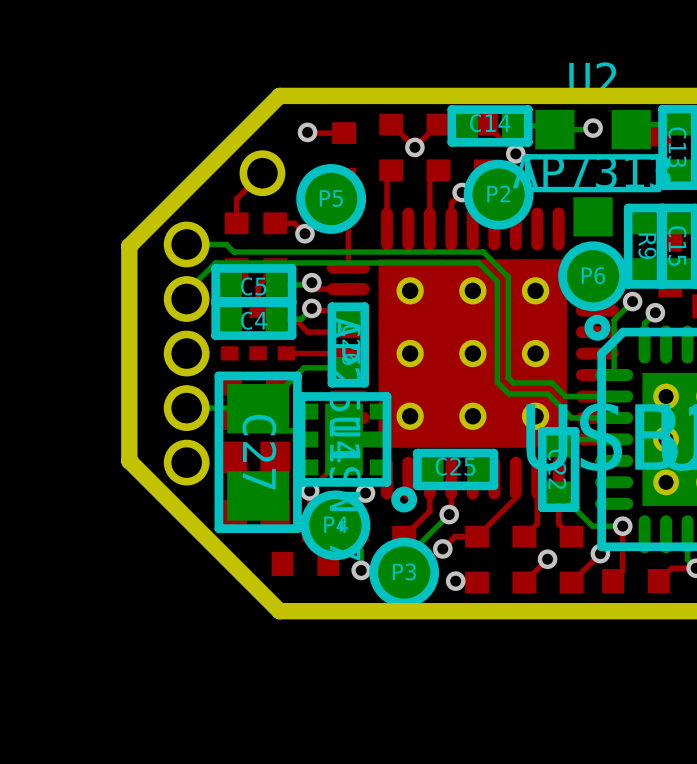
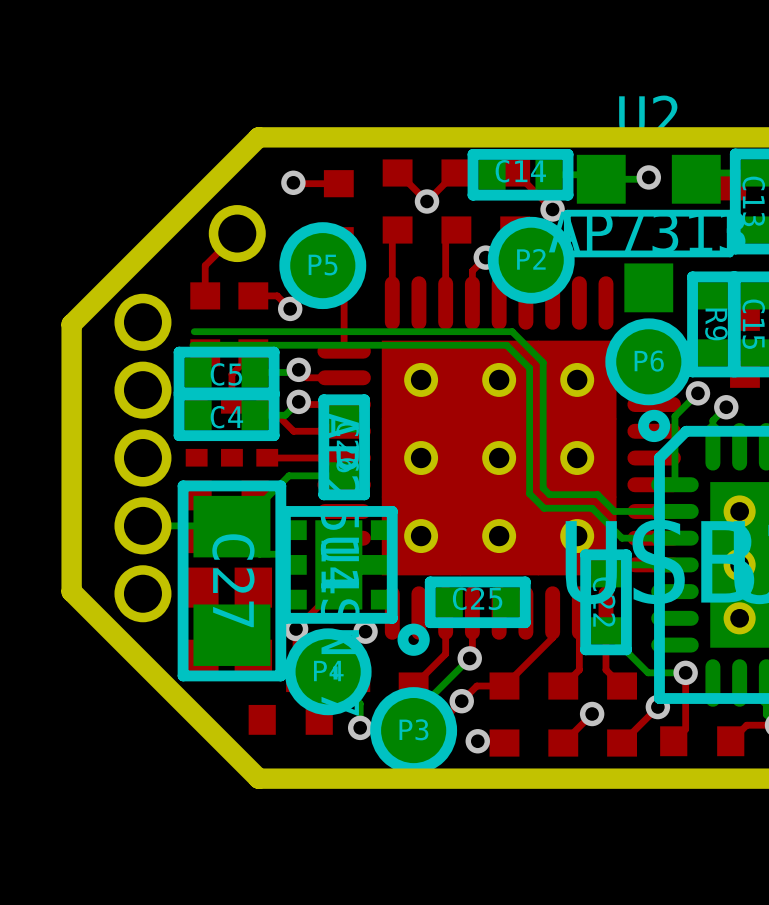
bottom track: (186, 244) (226, 244) (233, 252) -> (194, 331) (201, 331)
bottom track: (226, 262) (215, 262) (186, 291) (186, 299) -> none

